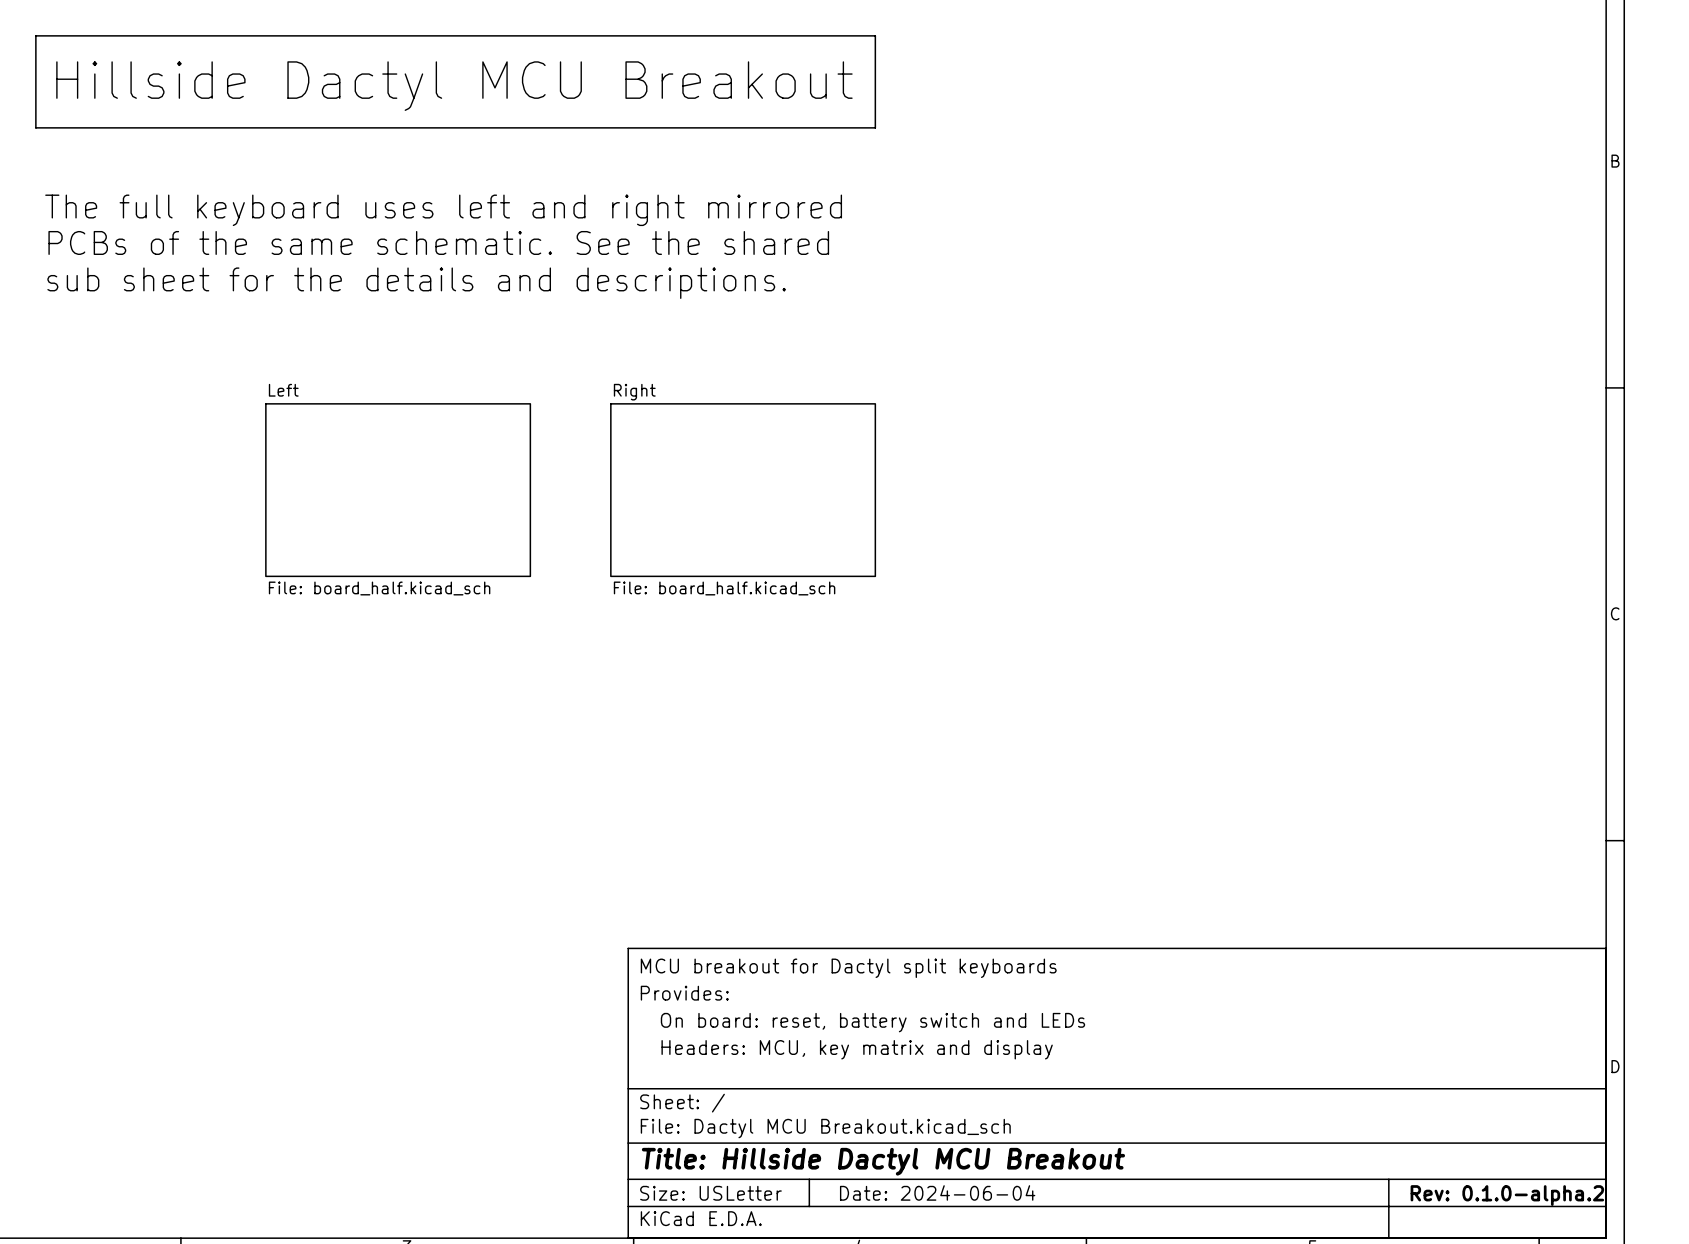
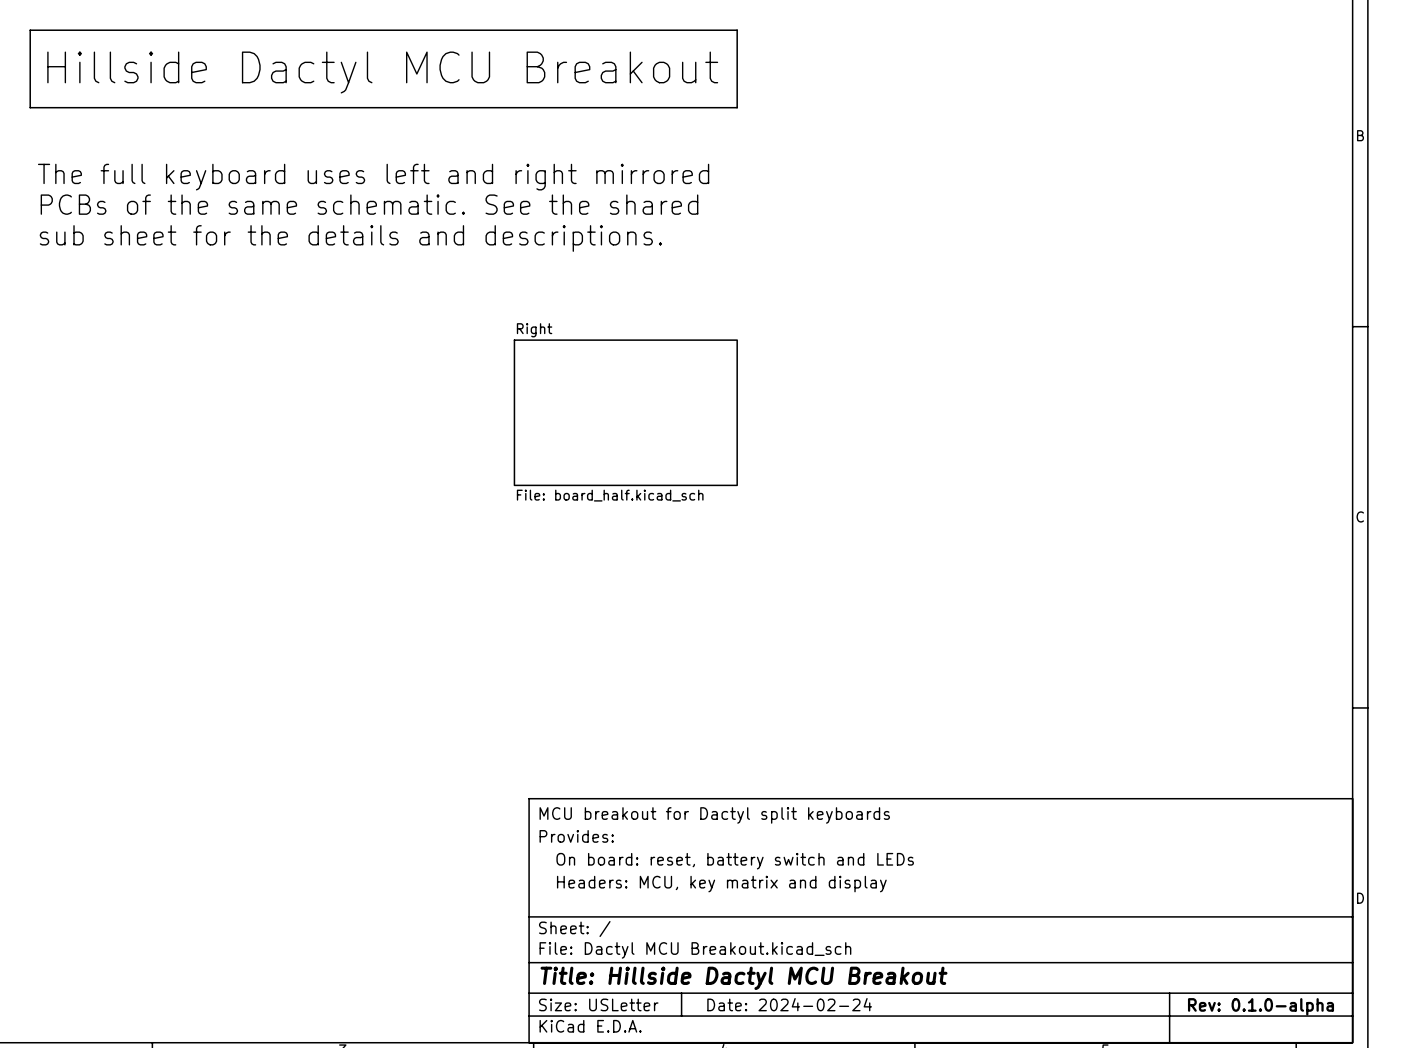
sheet Left: File: board_half.kicad_sch (398, 490) -> none
title block: Date: 2024-06-04 (937, 1192) -> Date: 2024-02-24 (789, 1004)
title block: Rev: 0.1.0-alpha.2 (1507, 1195) -> Rev: 0.1.0-alpha (1260, 1006)

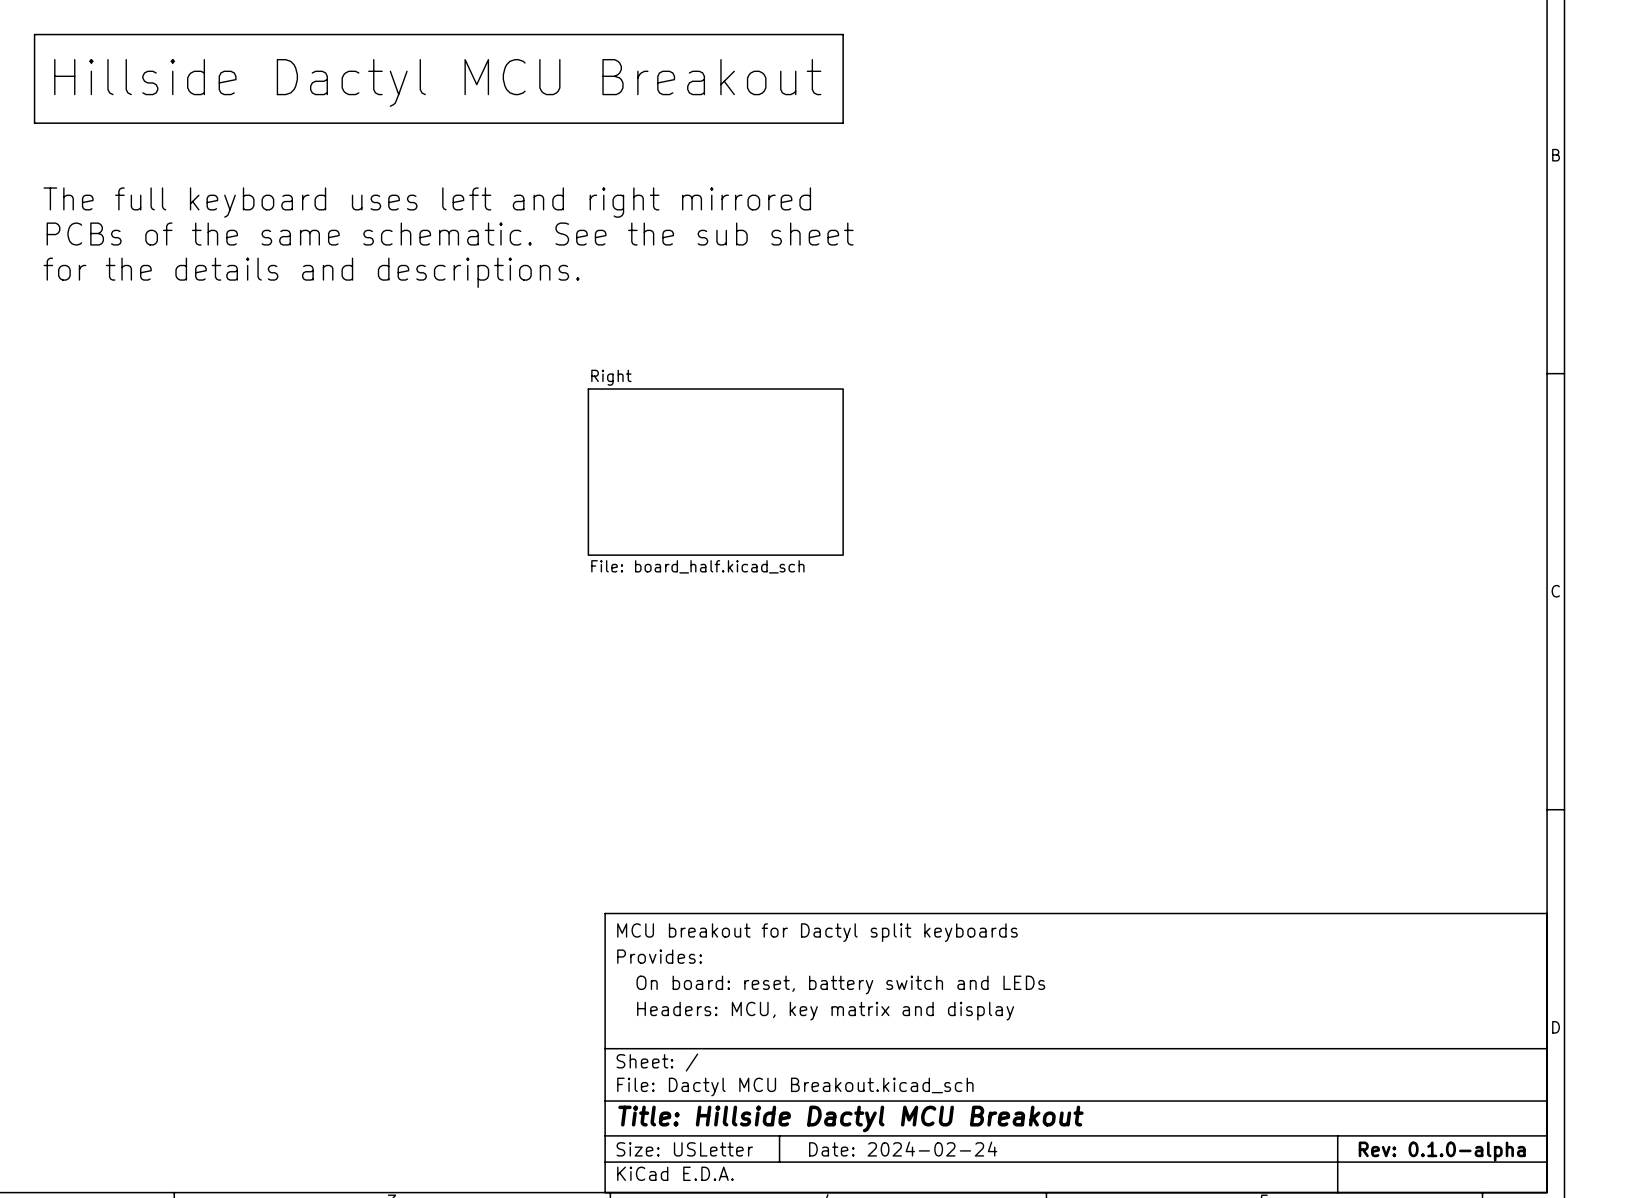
text: PCBs of the same schematic. See the shared (369, 204) -> PCBs of the same schematic. See the sub sheet (450, 234)
text: sub sheet for the details and descriptions. (350, 238) -> for the details and descriptions. (311, 272)

